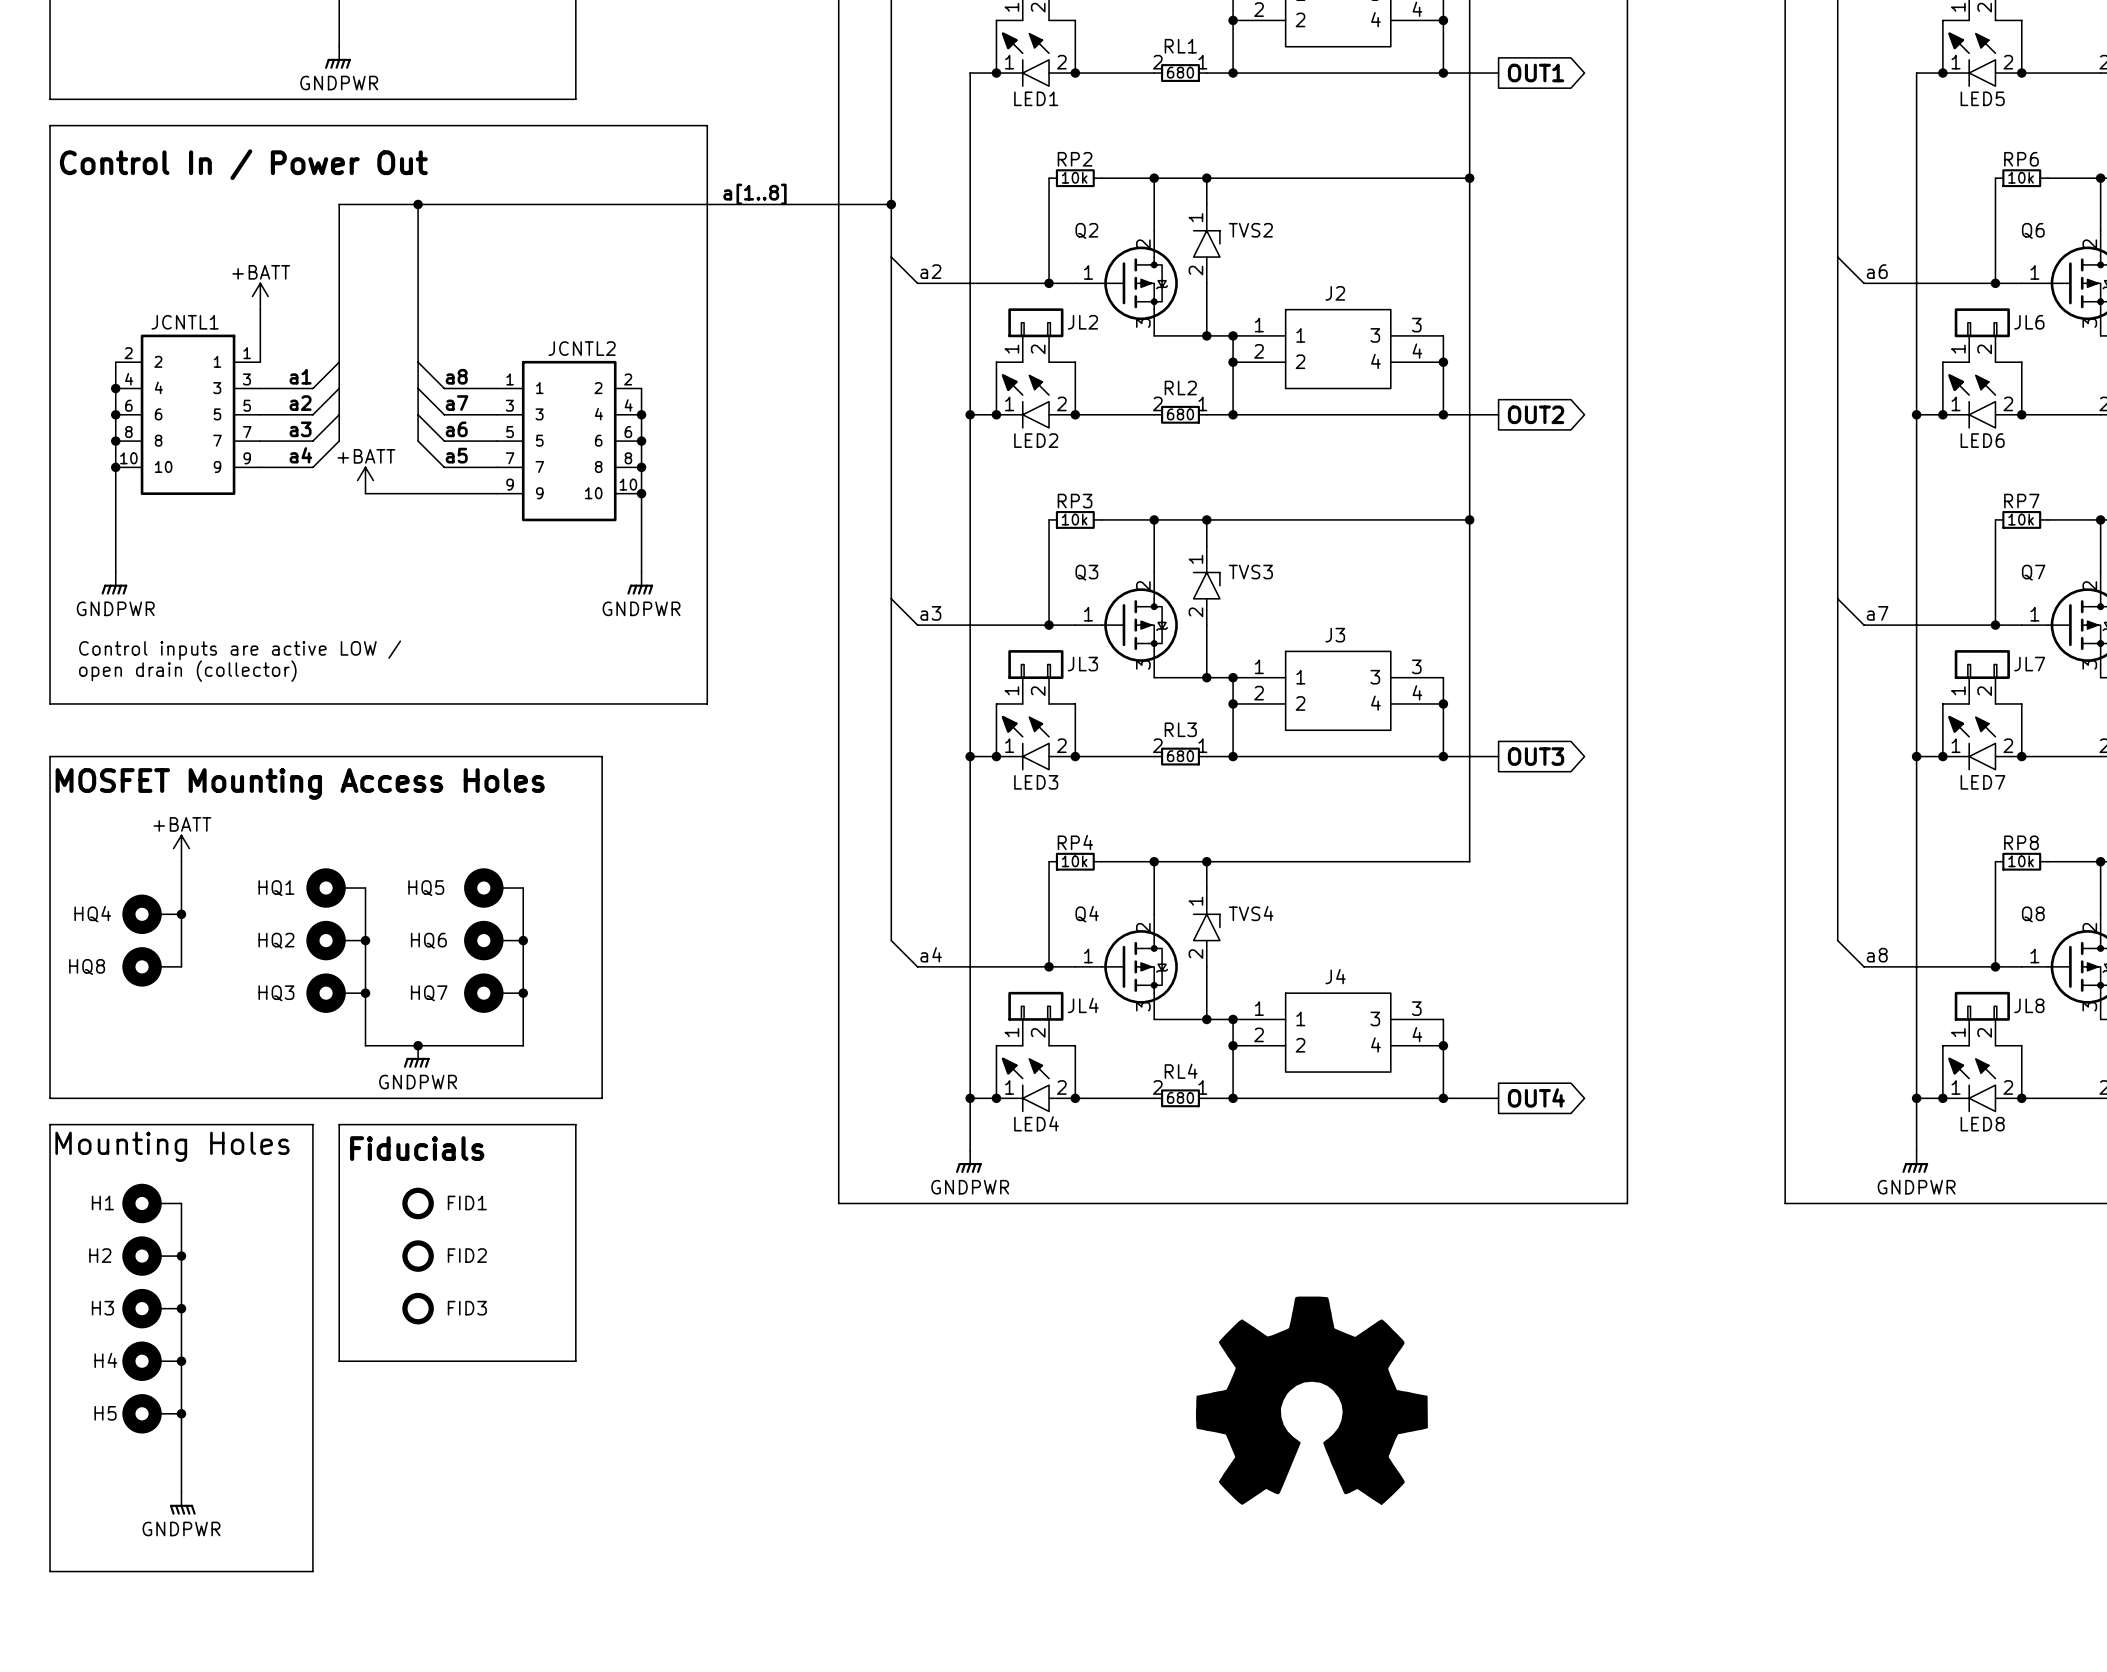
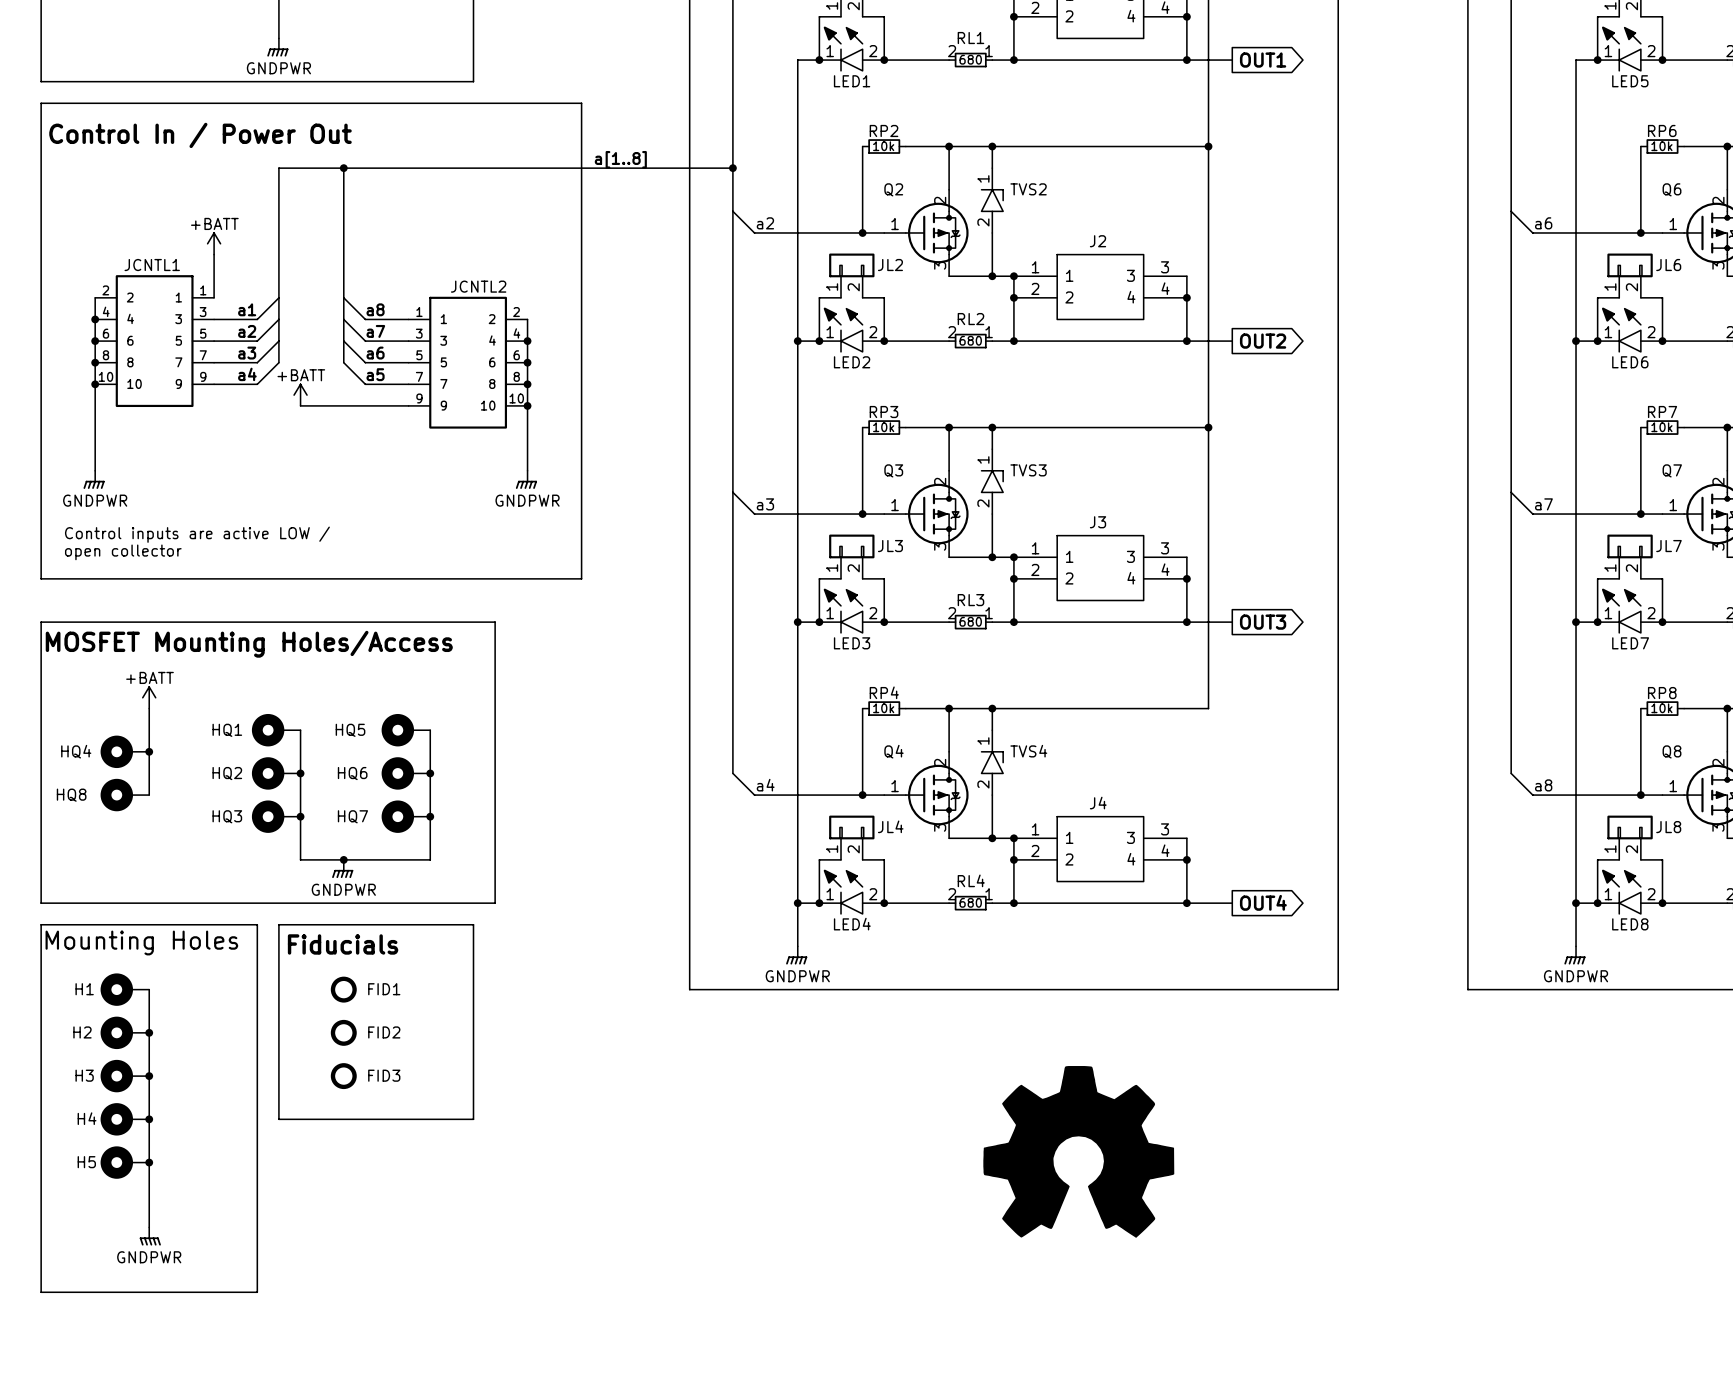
text: open drain (collector) (187, 671) -> open collector (123, 552)
text: MOSFET Mounting Access Holes (300, 783) -> MOSFET Mounting Holes/Access (249, 644)

